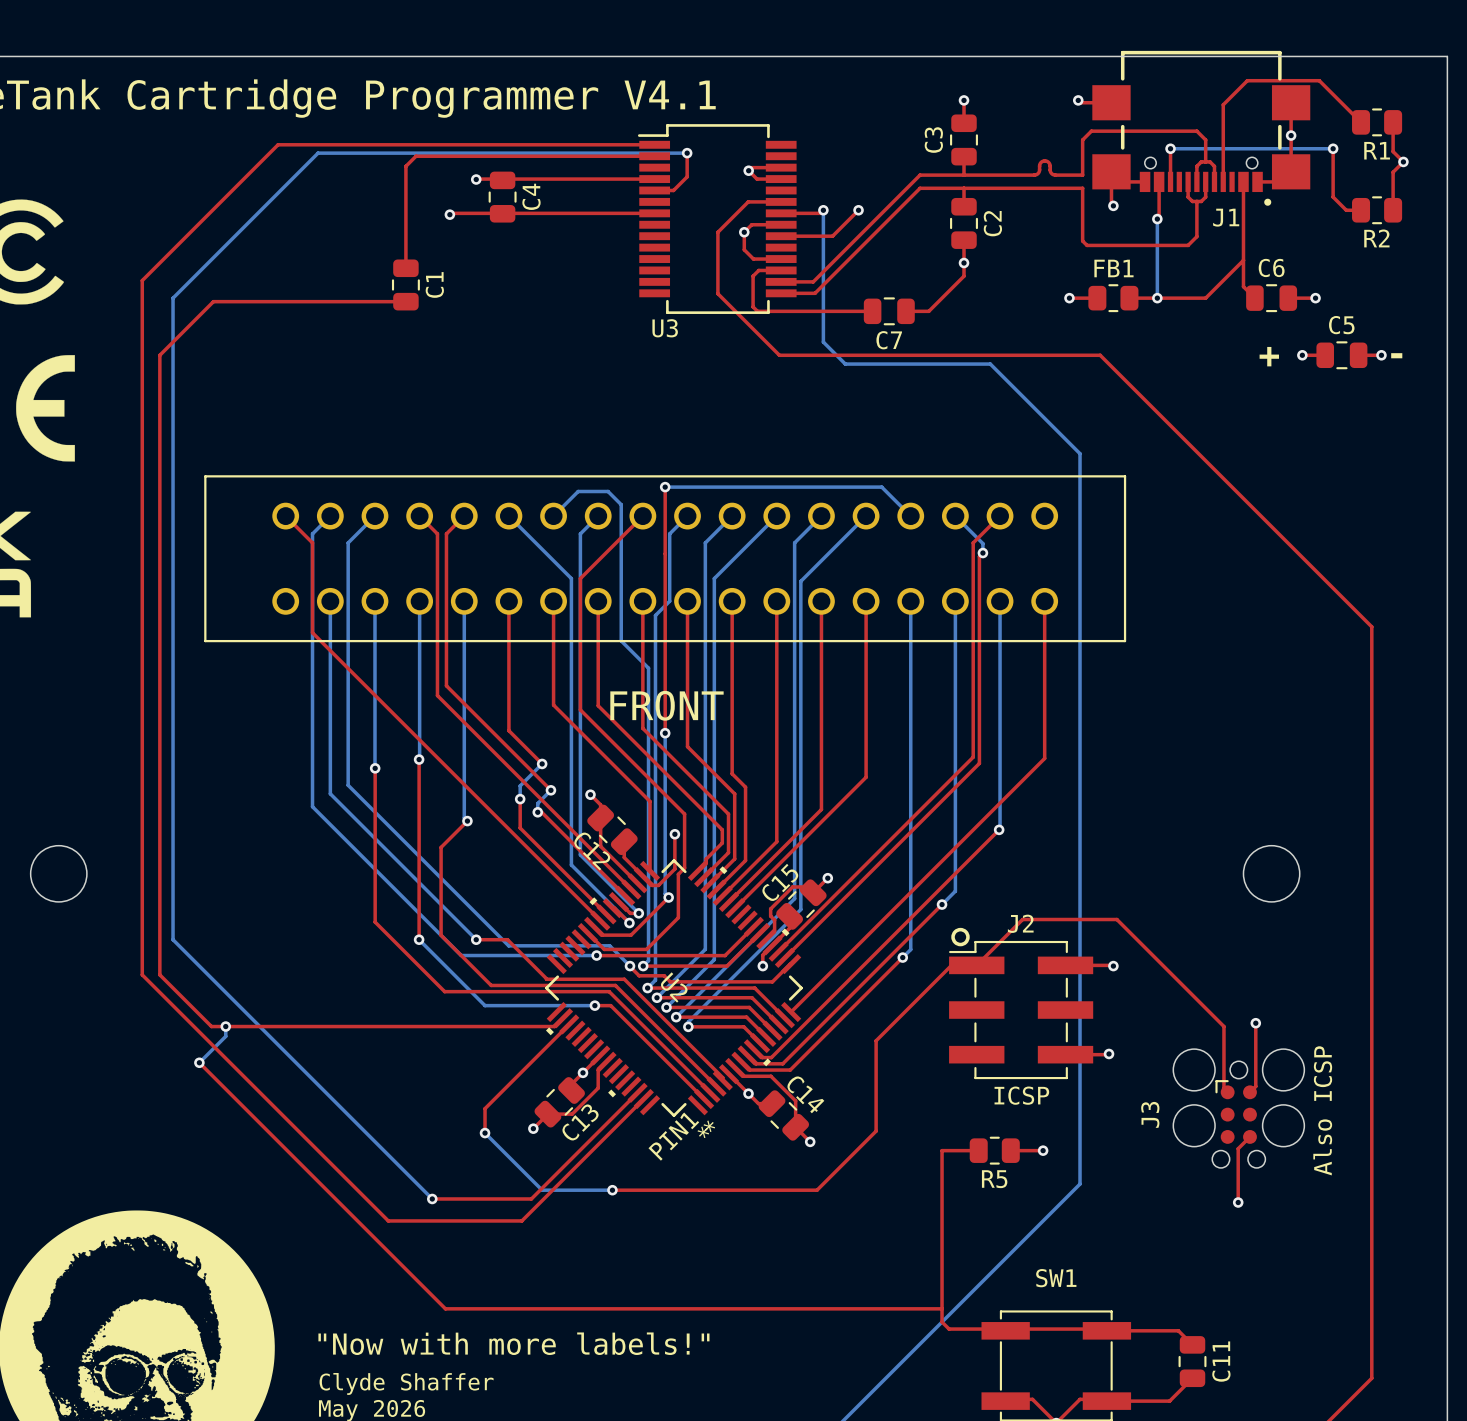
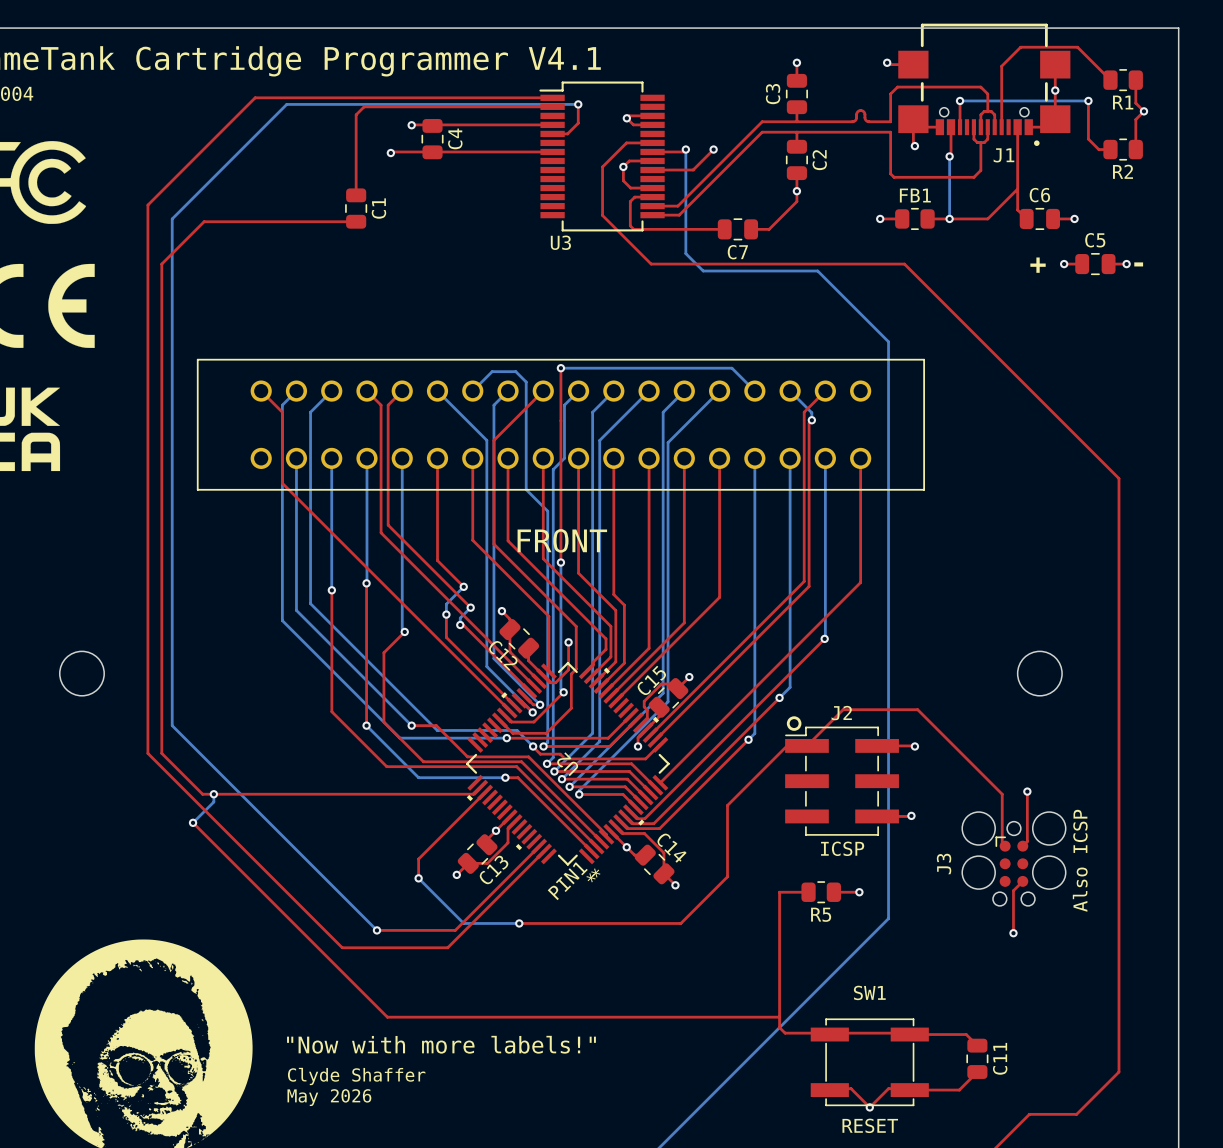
U2 name rotation: 0° (674, 987) -> 180° (567, 764)

